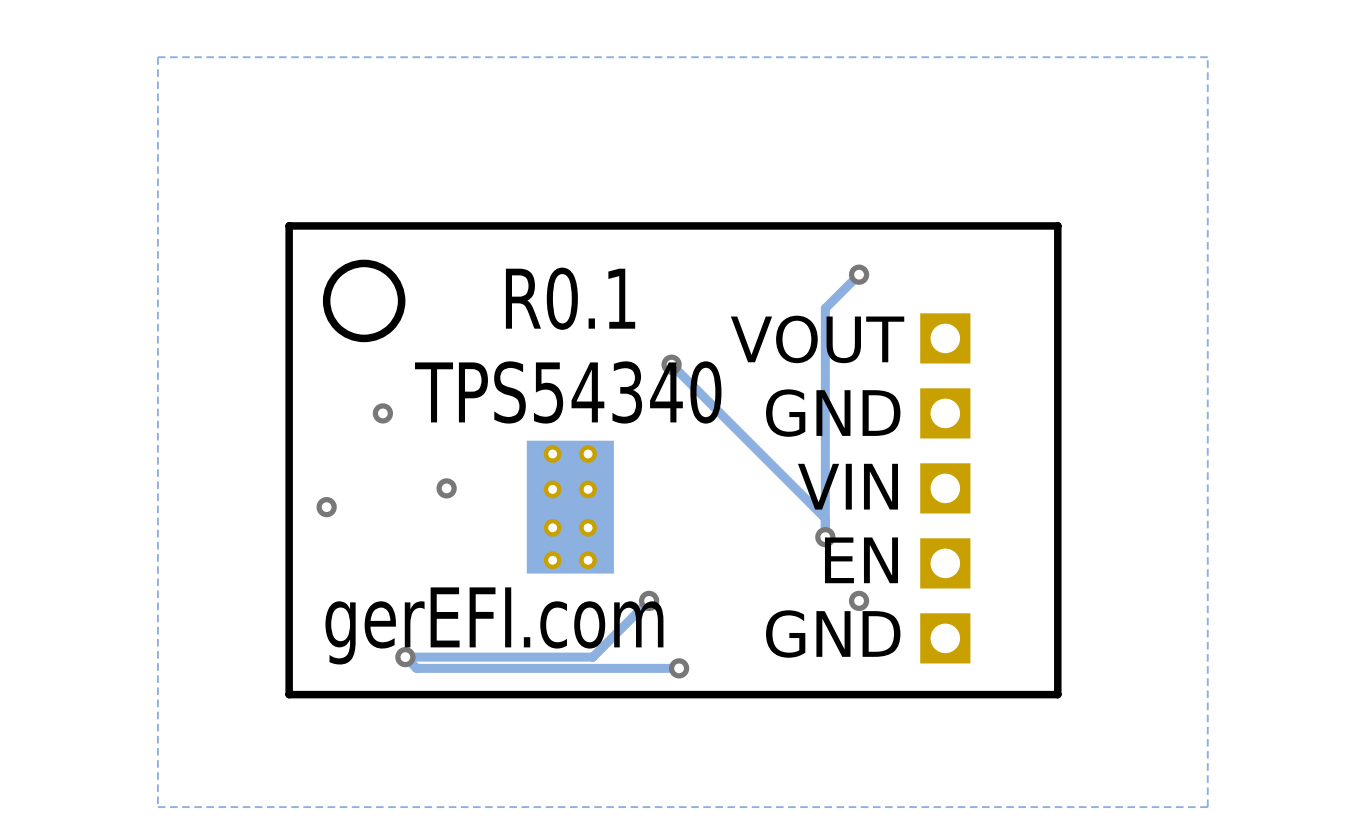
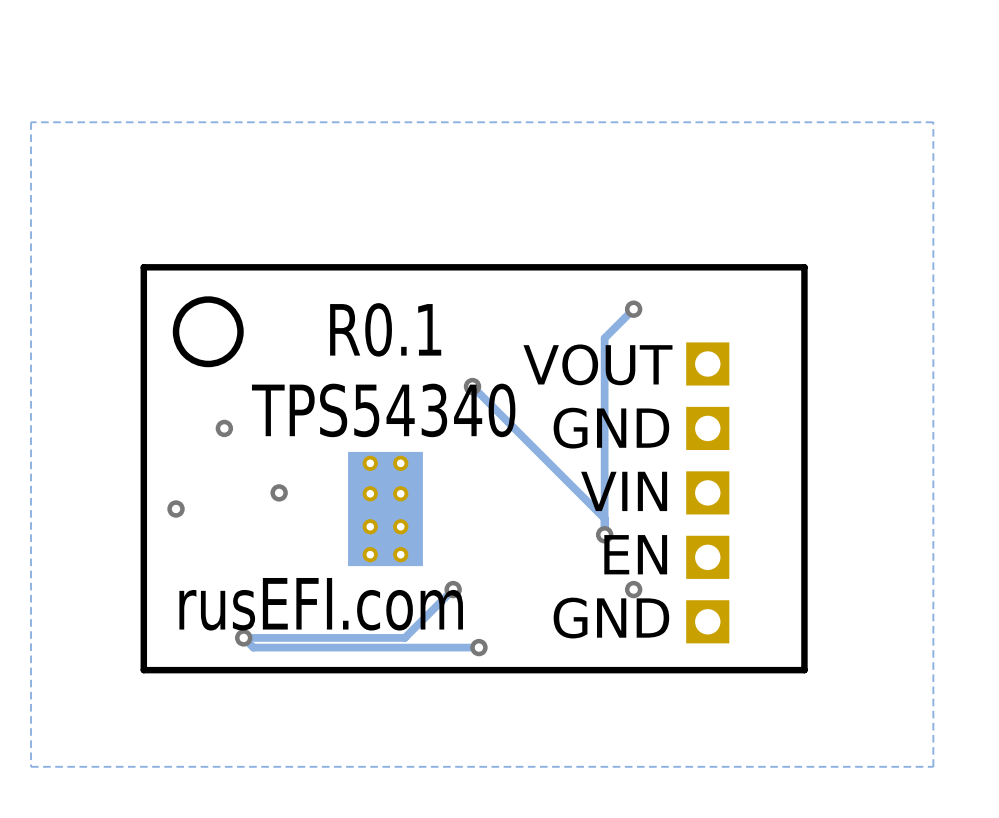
text: gerEFI.com (494, 625) -> rusEFI.com (321, 604)

